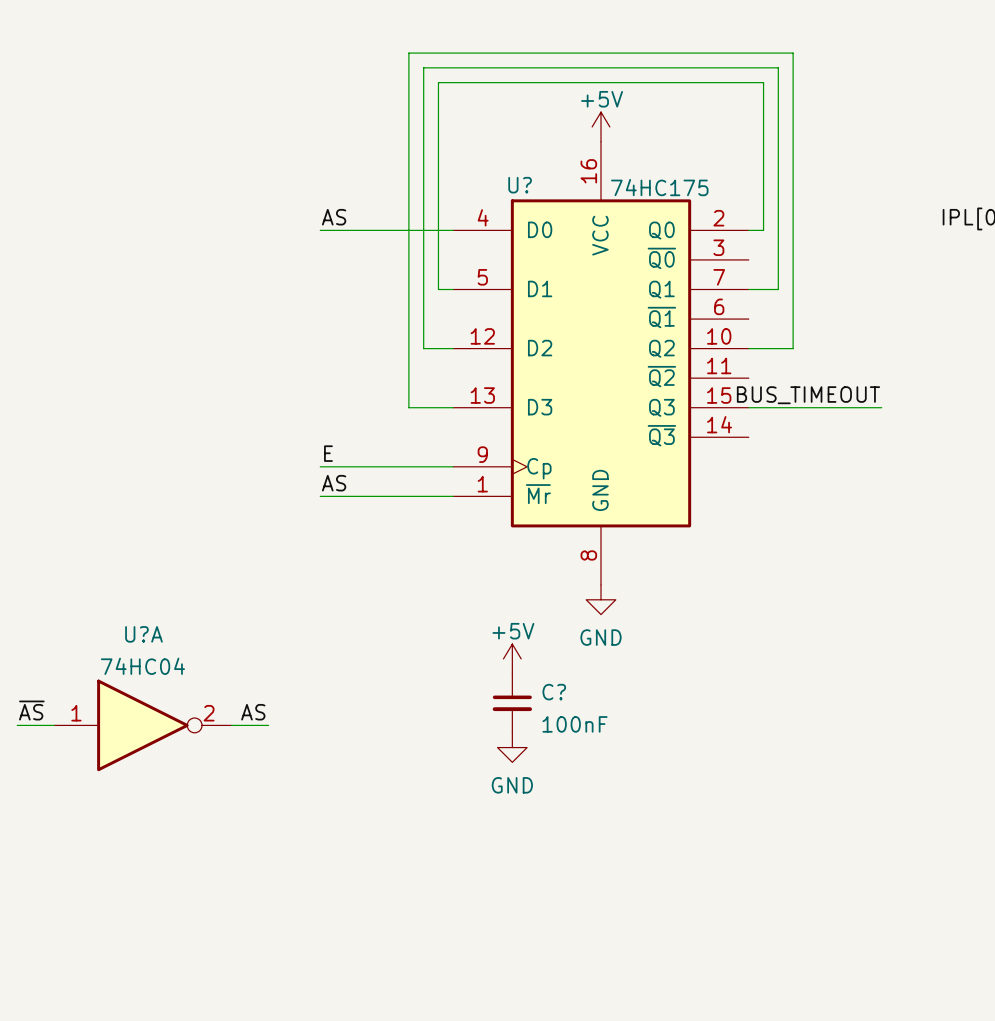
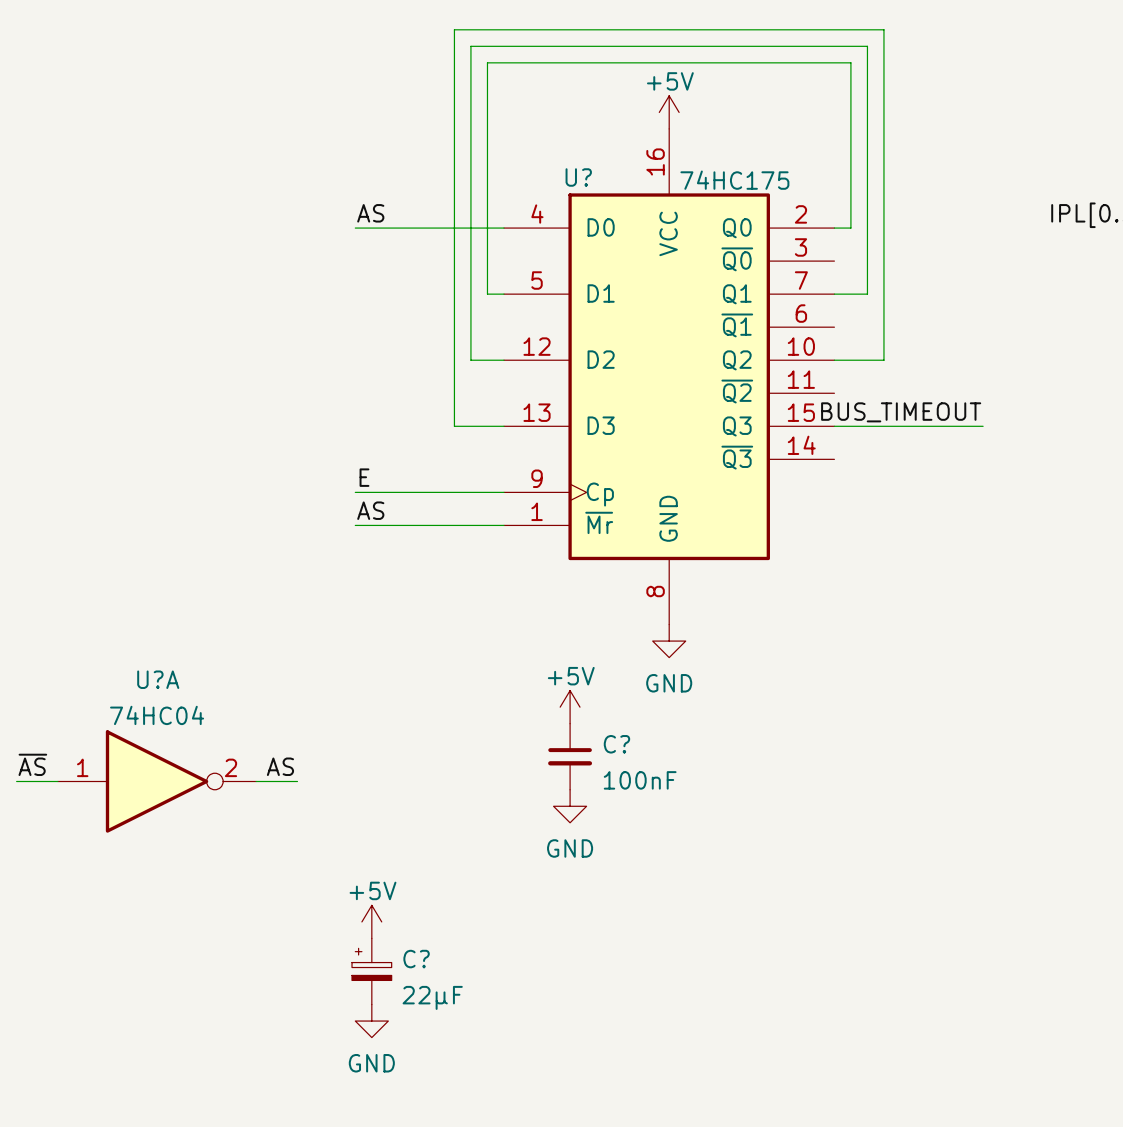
power symbol: none -> +5V (371, 921)
C?: none -> 22µF (371, 971)
power symbol: none -> GND (371, 1021)

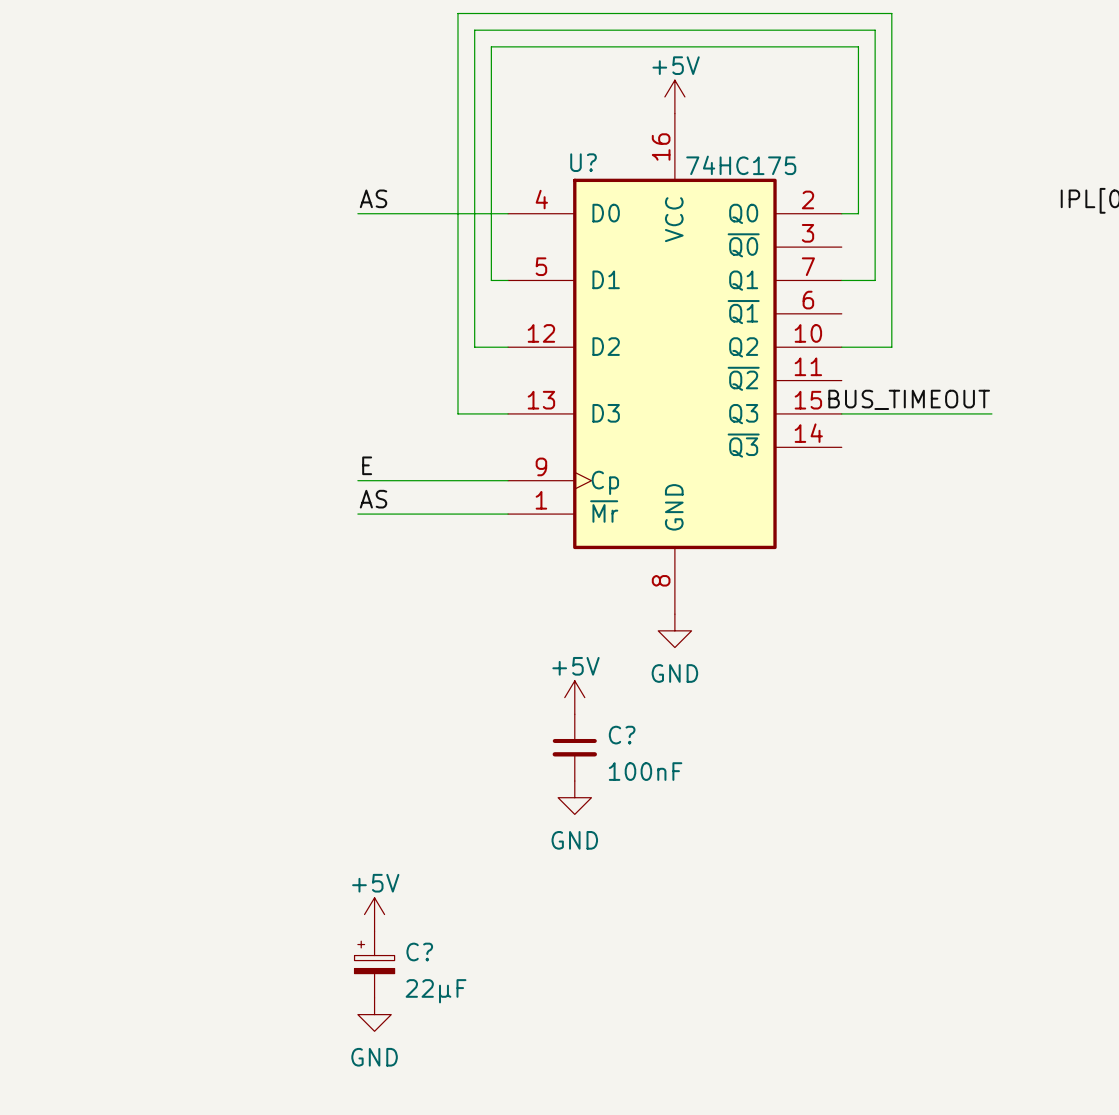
label: ~{AS} (32, 764) -> none
label: AS (280, 766) -> none
wire: (16, 781) (57, 781) -> none
U?A: 74HC04 (157, 781) -> none
wire: (256, 781) (297, 781) -> none

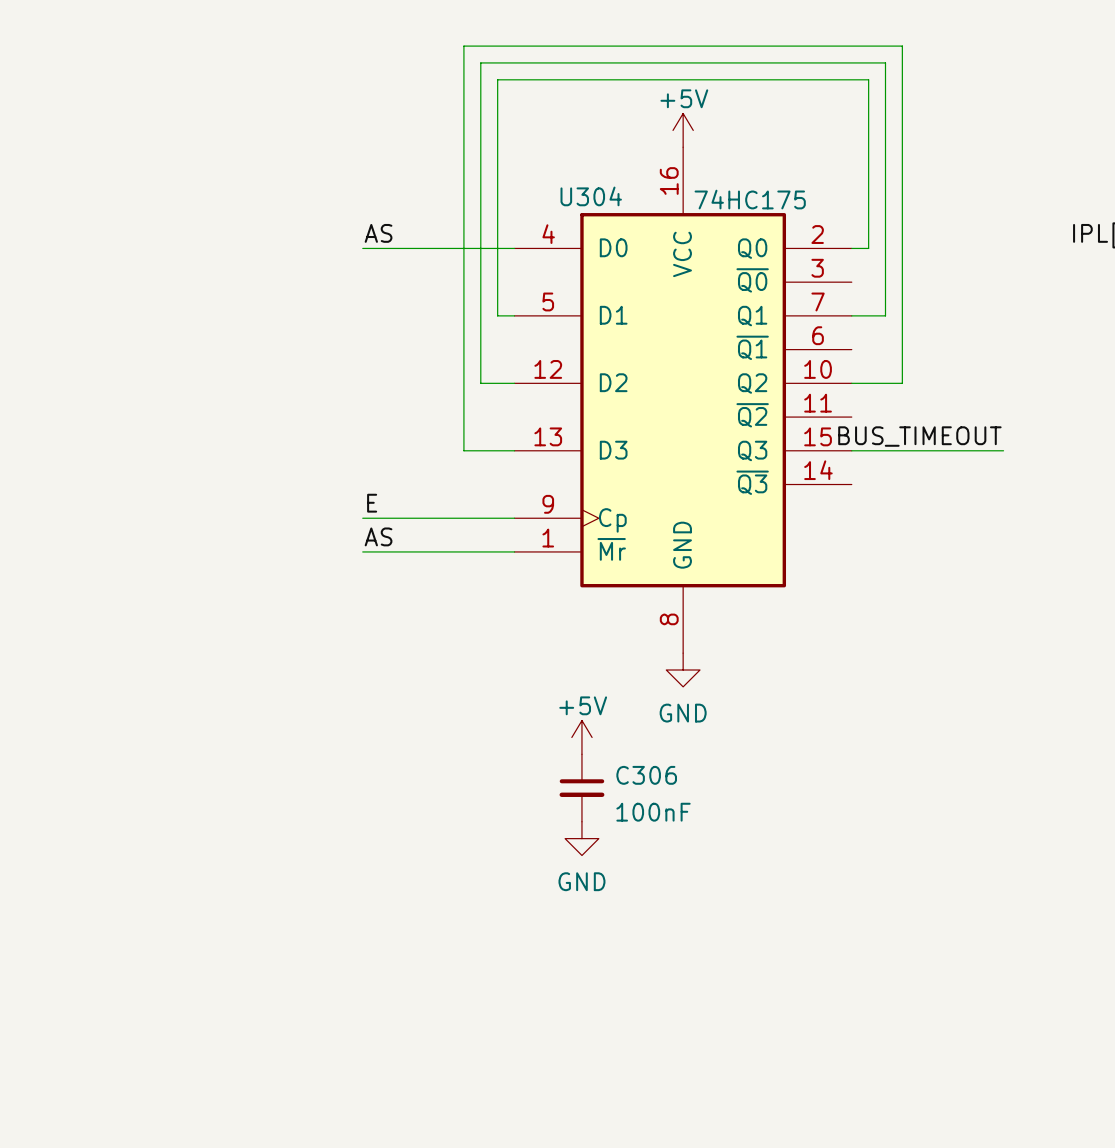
U? name: U? (583, 162) -> U304 (591, 196)
C? name: C? (622, 735) -> C306 (646, 775)
power symbol: +5V (374, 914) -> none
C?: 22µF (374, 964) -> none
power symbol: GND (374, 1014) -> none

